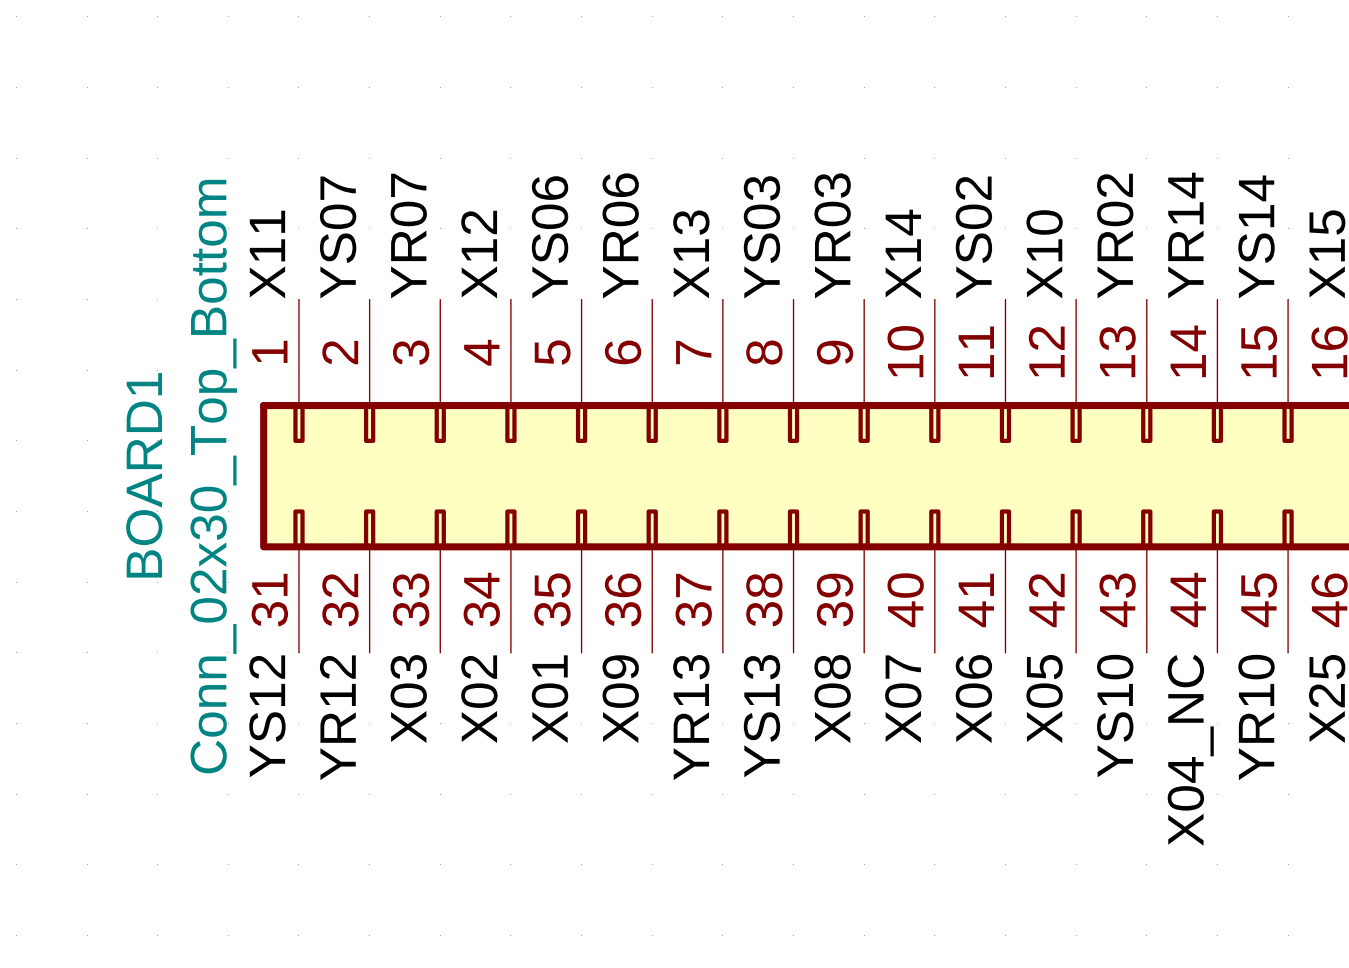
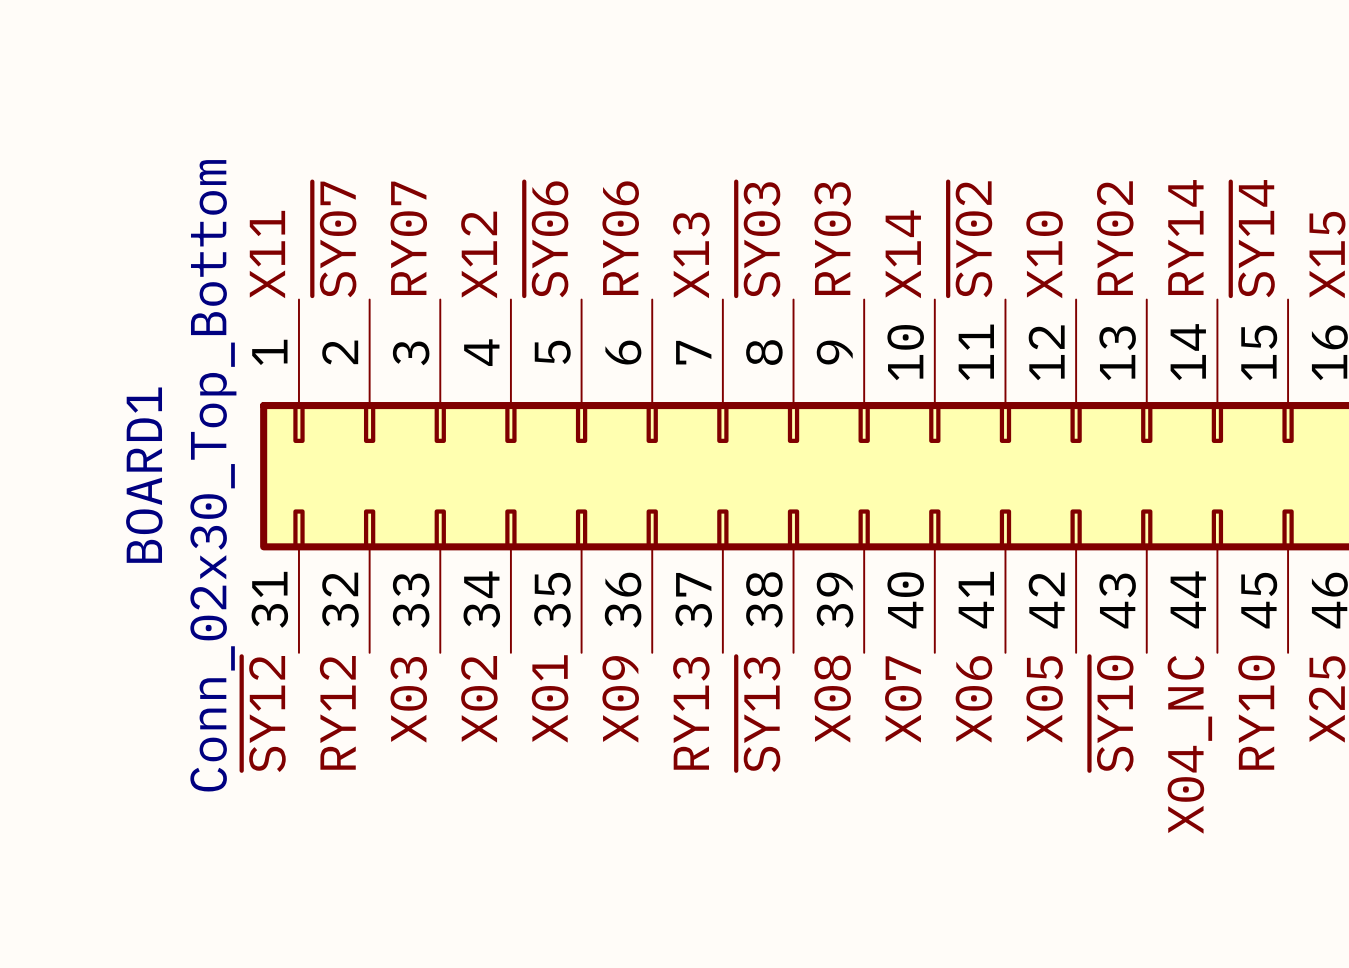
label: YR06 (620, 235) -> RY06 (620, 238)
label: YR03 (832, 235) -> RY03 (832, 238)
label: YR14 (1185, 235) -> RY14 (1185, 237)
label: YR07 (408, 236) -> RY07 (408, 238)
label: YR02 (1115, 236) -> RY02 (1115, 238)
label: YS14 (1256, 236) -> ~{SY14} (1252, 238)
label: YS07 (338, 237) -> ~{SY07} (334, 239)
label: YS06 (550, 237) -> ~{SY06} (546, 239)
label: YS03 (761, 237) -> ~{SY03} (758, 239)
label: YS02 (973, 237) -> ~{SY02} (970, 239)
label: YS12 (267, 716) -> ~{SY12} (263, 714)
label: YS13 (761, 716) -> ~{SY13} (758, 714)
label: YS10 (1115, 716) -> ~{SY10} (1111, 713)
label: YR12 (337, 717) -> RY12 (337, 712)
label: YR13 (691, 717) -> RY13 (691, 713)
label: YR10 (1256, 717) -> RY10 (1256, 712)

